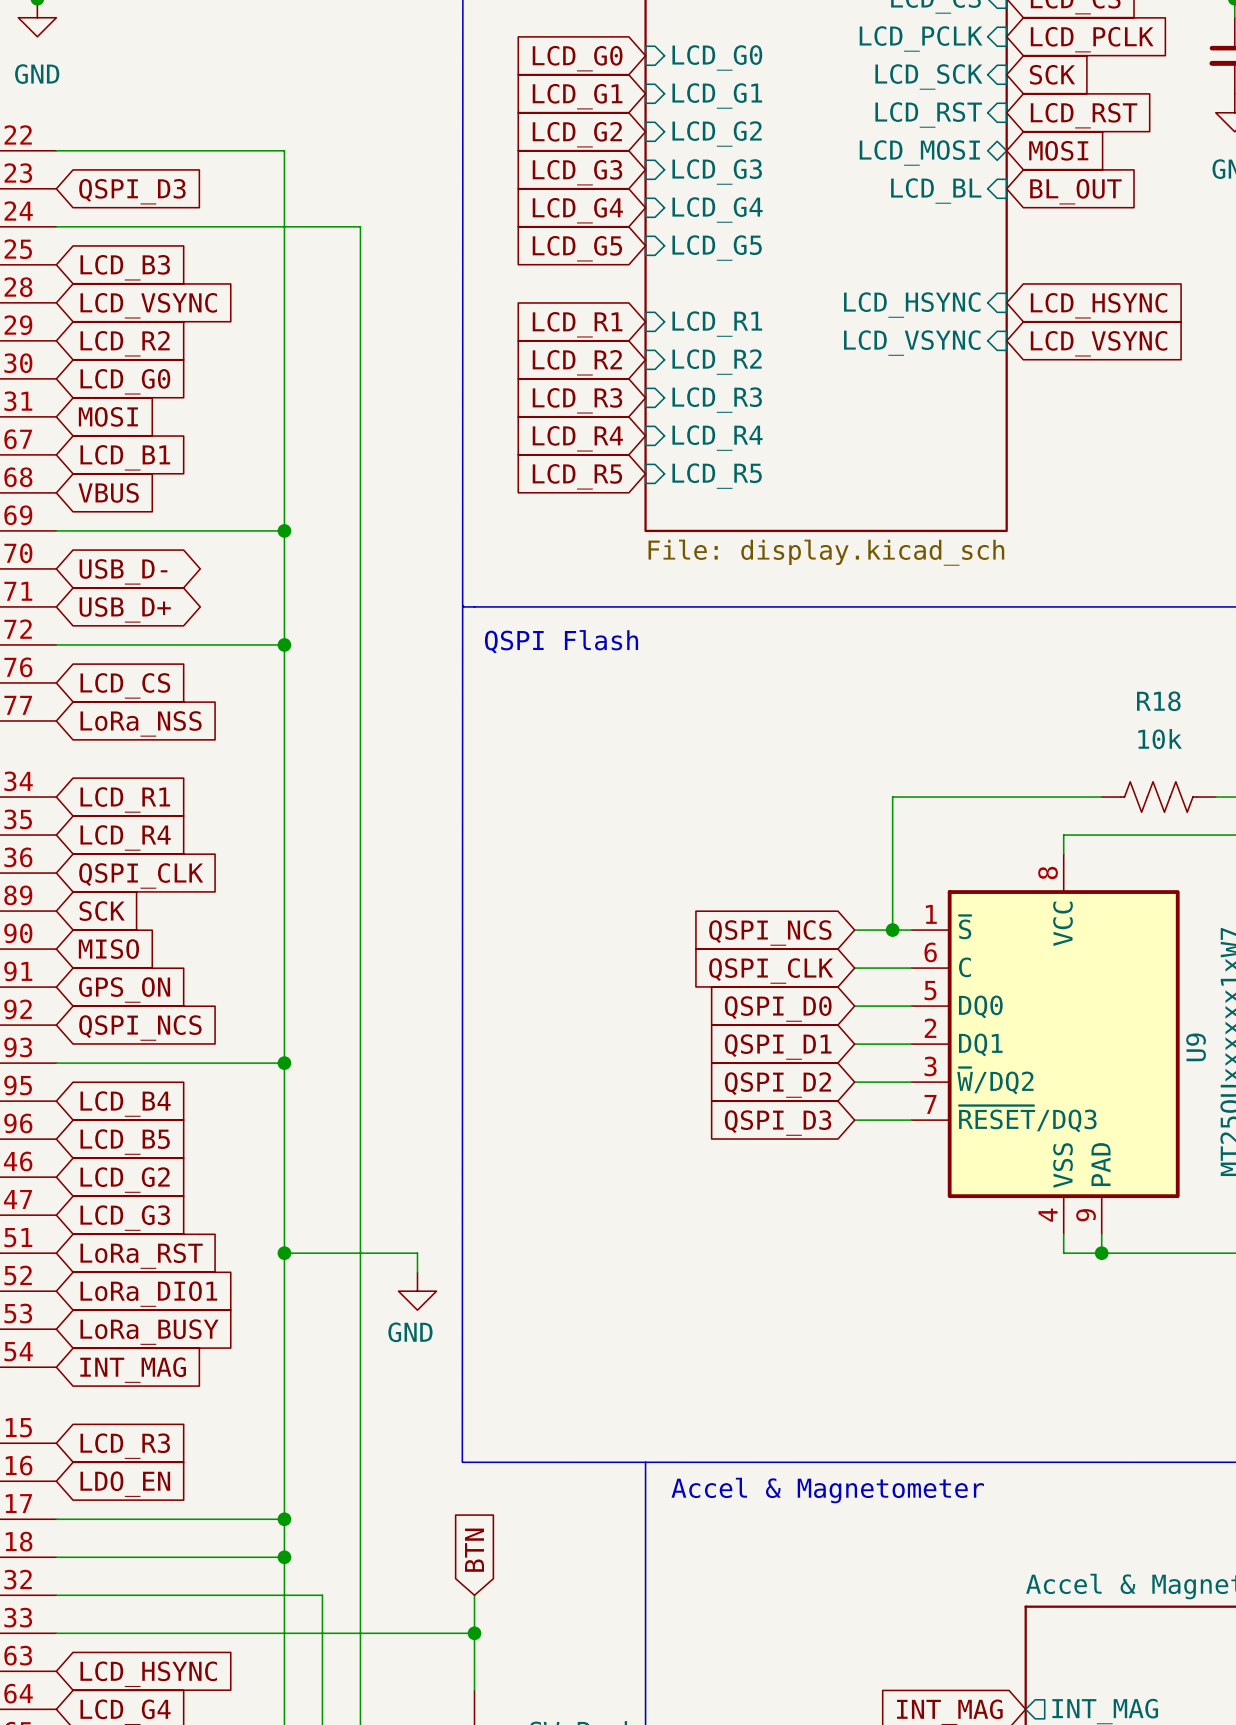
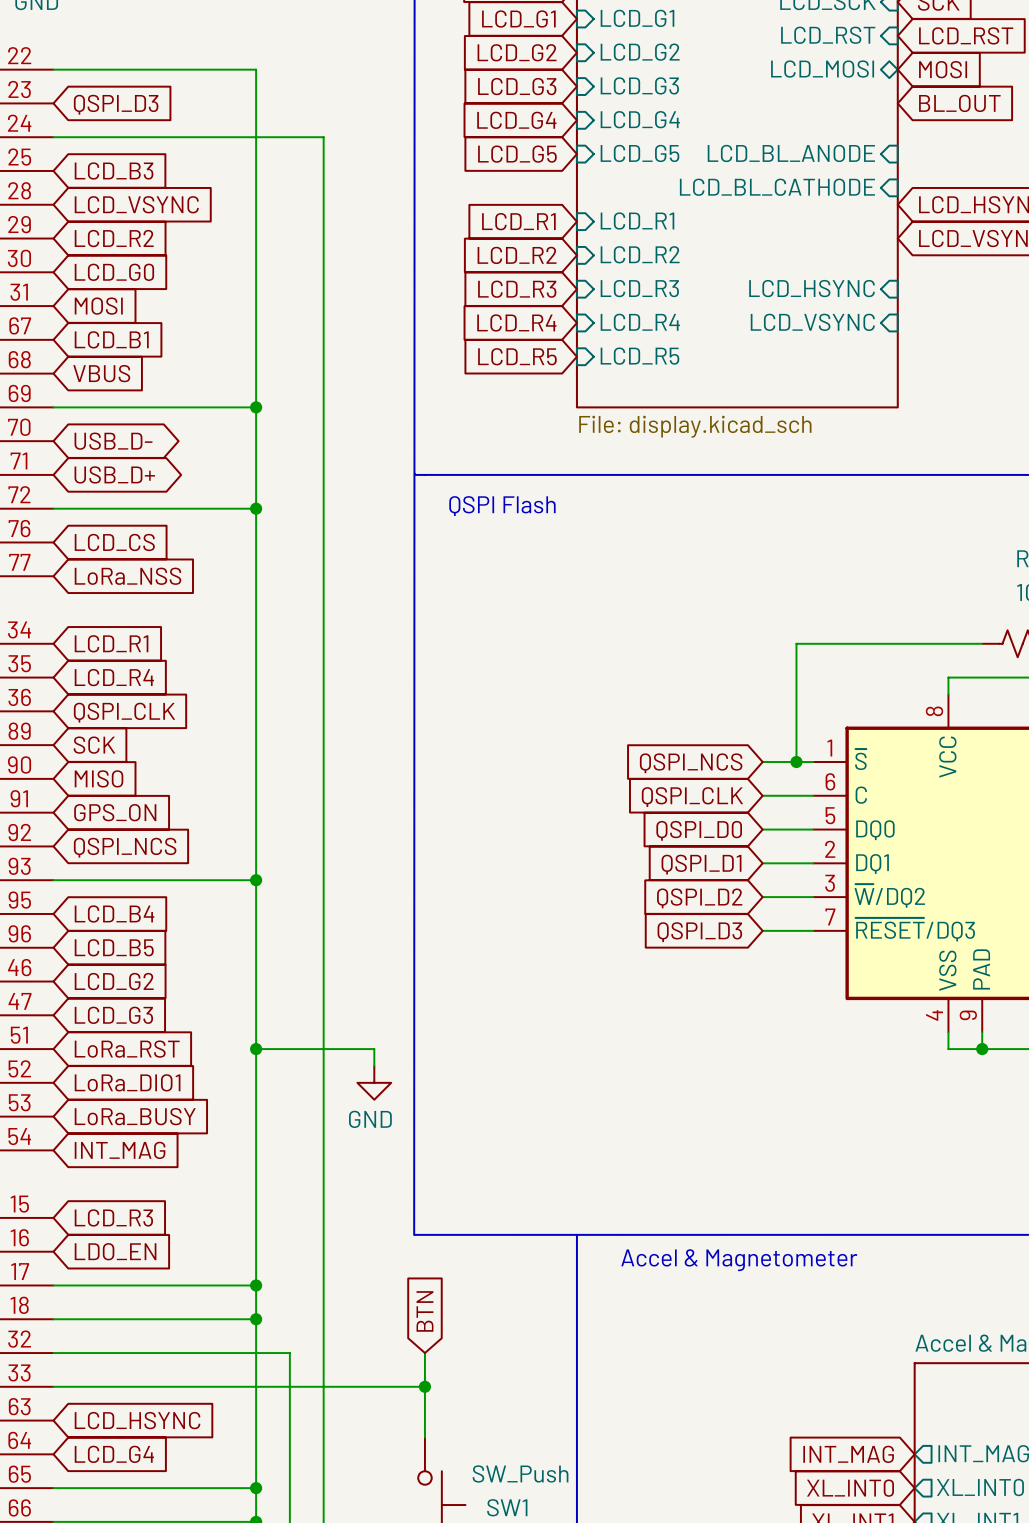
sheet pin: LCD_BL (936, 191) -> none
sheet pin: none -> LCD_BL_ANODE (791, 153)
sheet pin: none -> LCD_BL_CATHODE (777, 187)
sheet pin position: LCD_HSYNC (912, 305) -> LCD_HSYNC (811, 288)
sheet pin position: LCD_VSYNC (912, 343) -> LCD_VSYNC (812, 322)

